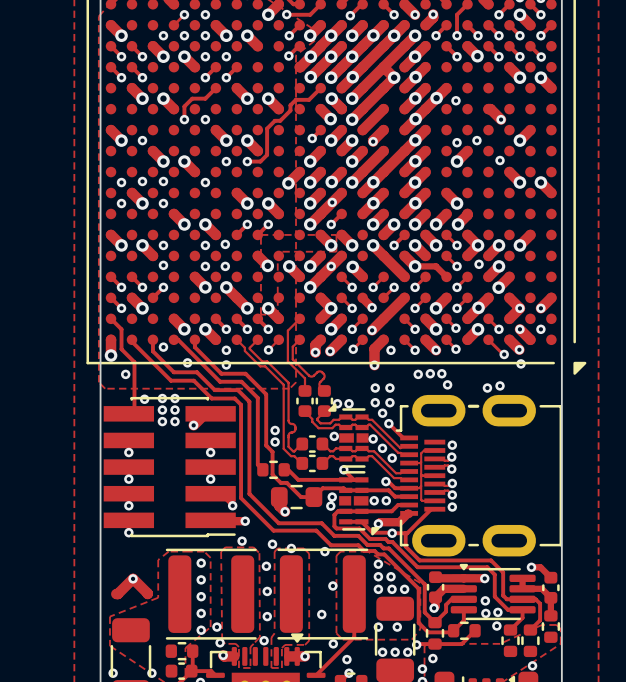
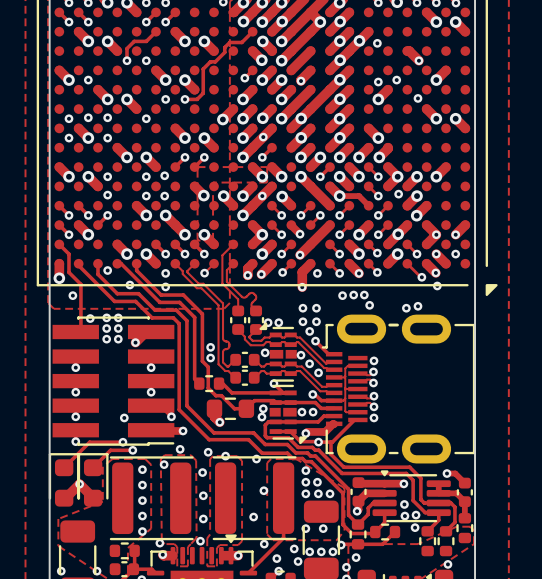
via: none -> (124, 417)
track: none -> (122, 442) (89, 442) (64, 467)
via: none -> (122, 442)
track: none -> (132, 450) (110, 450) (93, 467)
via: none -> (132, 450)
via: none -> (164, 464)
part: none -> (64, 479)
part: none -> (93, 479)
via: (216, 627) -> none
via: none -> (294, 548)
via: none -> (298, 561)

